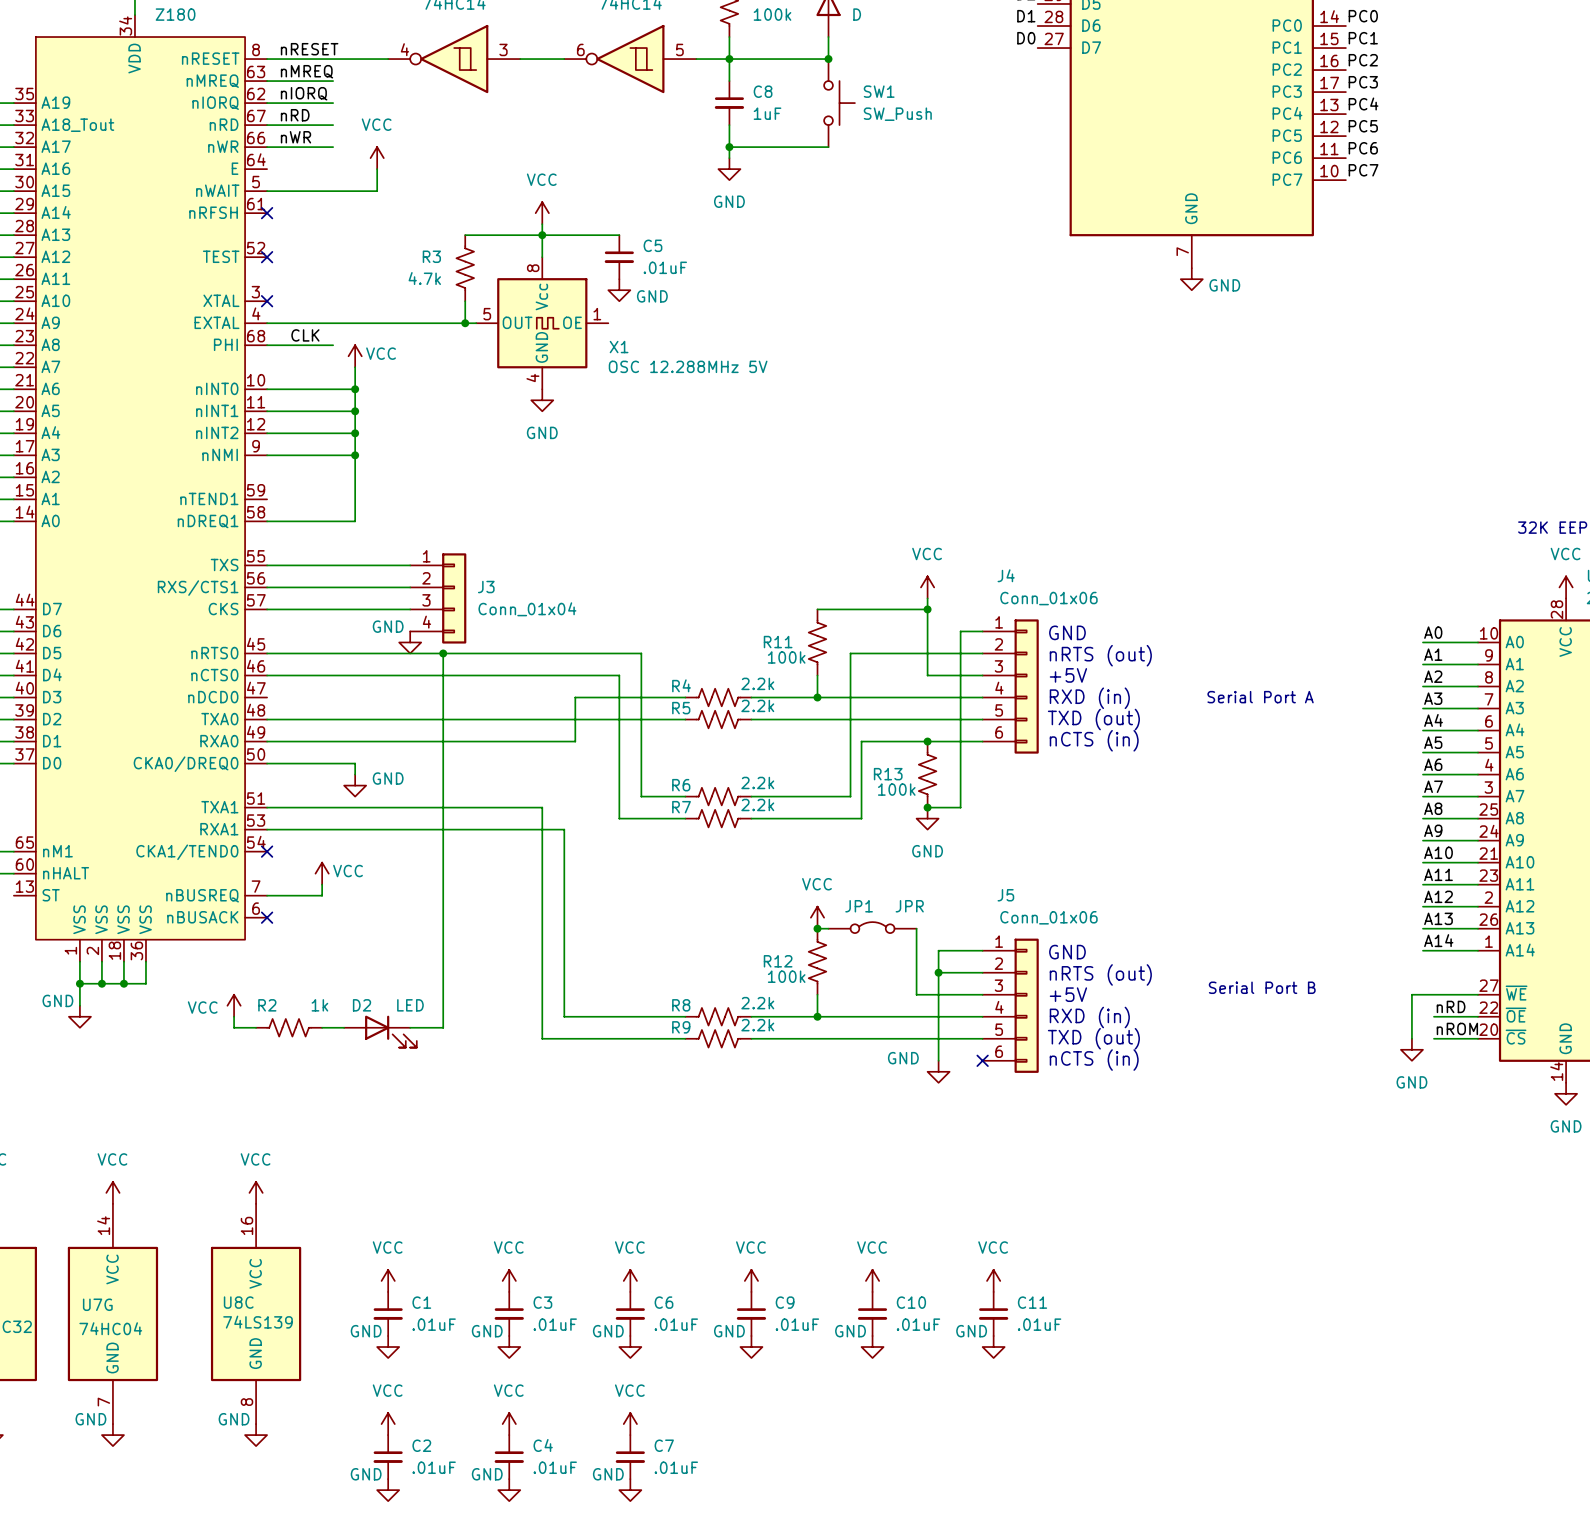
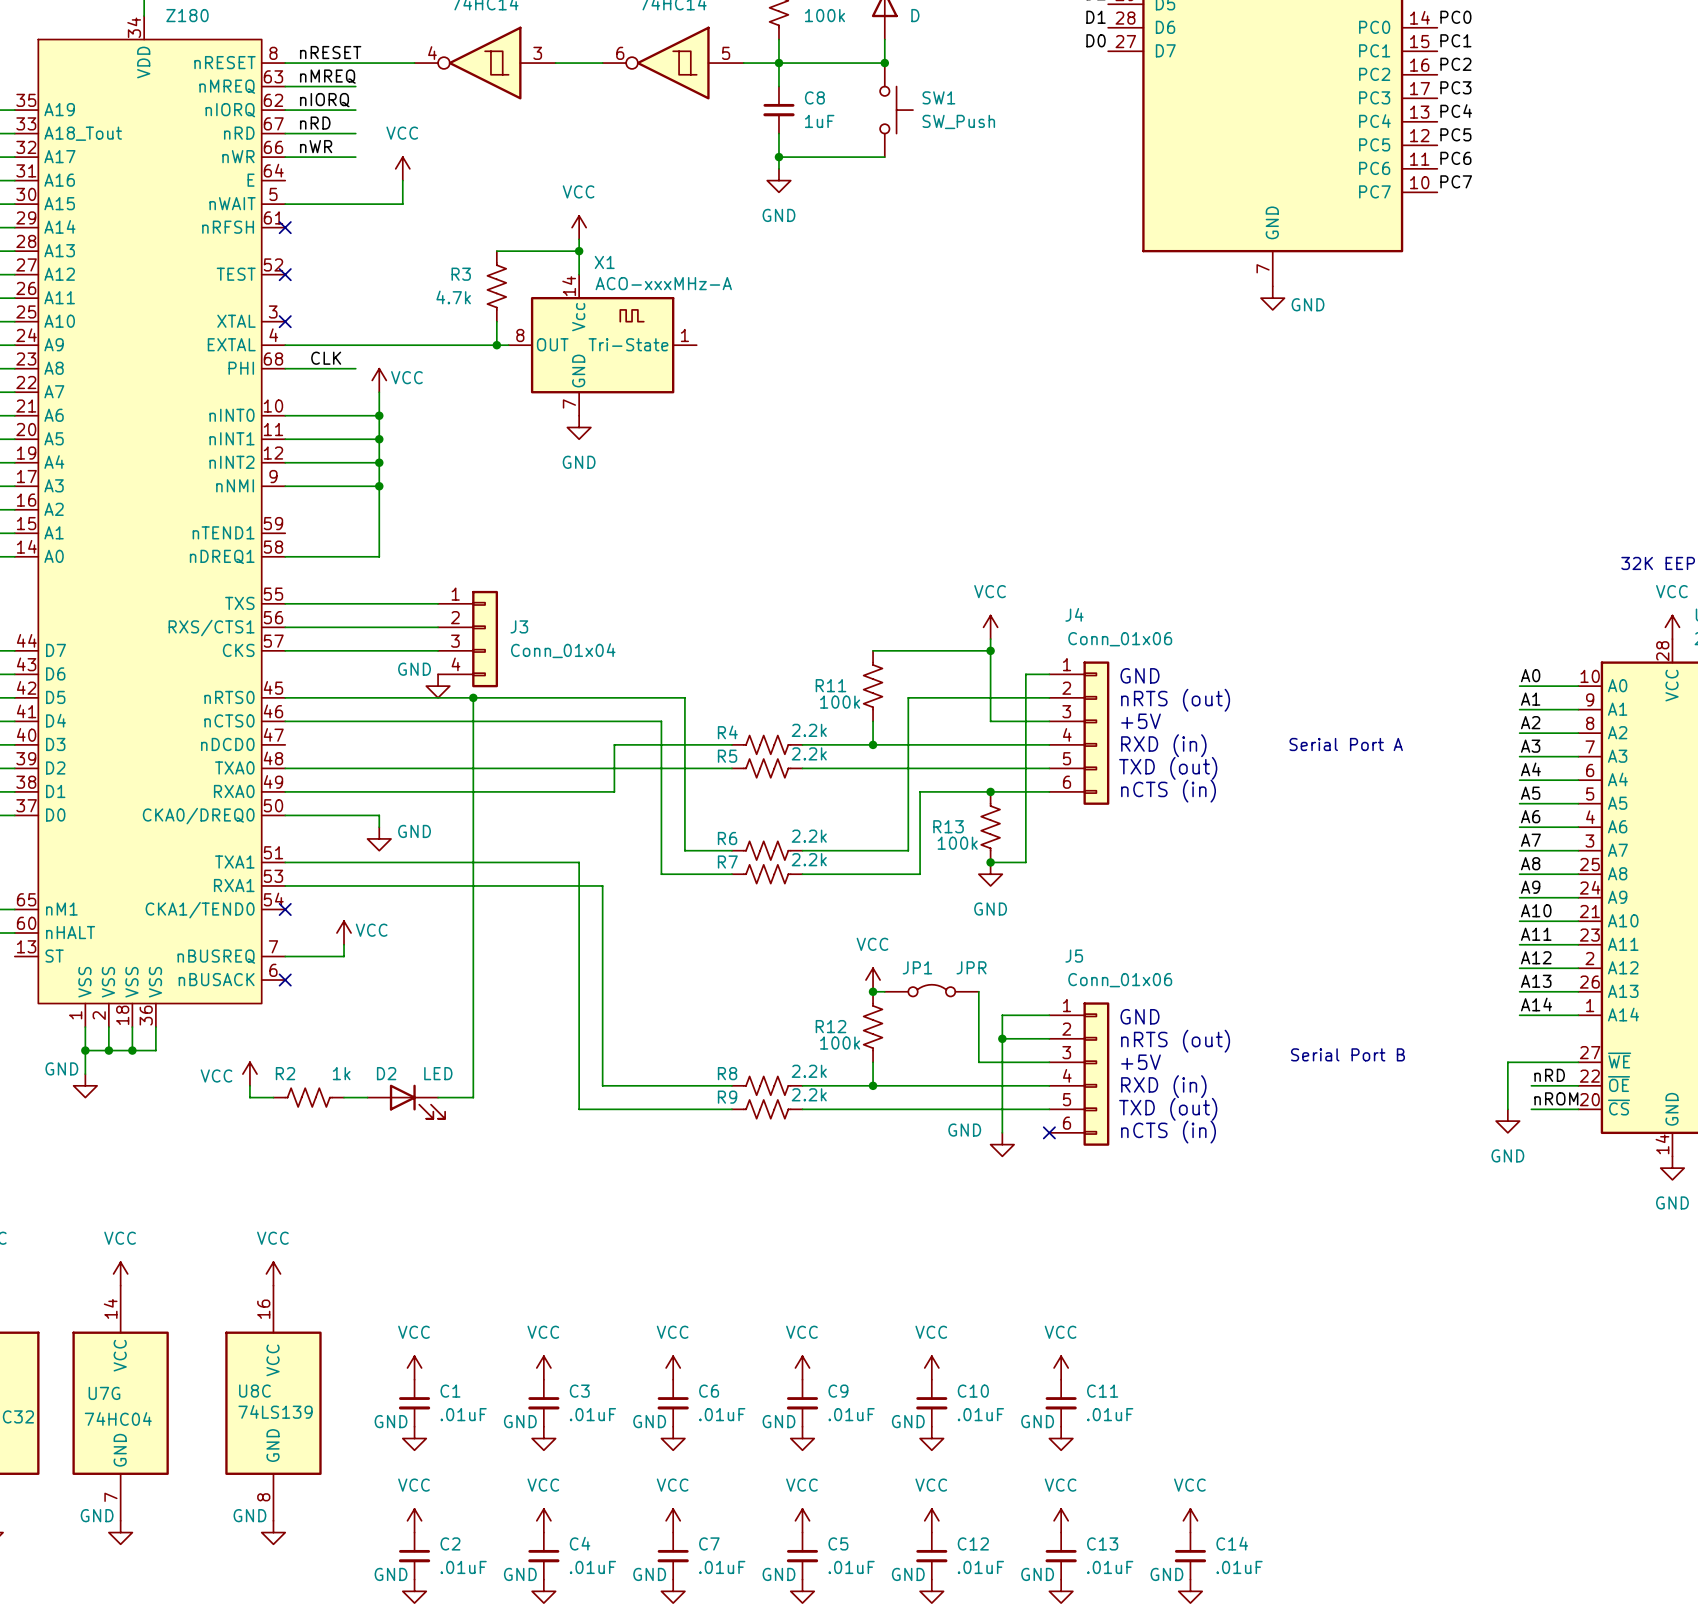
wire: (542, 235) (619, 235) -> none
X1 symbol: [476, 257, 609, 390] -> [508, 274, 697, 416]
C5 position: (619, 257) -> (802, 1556)
power symbol: GND (619, 290) -> none
X1 name position: X1 (619, 347) -> X1 (604, 262)
X1 value: OSC 12.288MHz 5V (688, 366) -> ACO-xxxMHz-A (663, 283)
power symbol: none -> VCC (802, 1520)
power symbol: none -> VCC (931, 1520)
power symbol: none -> VCC (1061, 1520)
power symbol: none -> VCC (1190, 1520)
C12: none -> .01uF (931, 1556)
C13: none -> .01uF (1061, 1556)
C14: none -> .01uF (1190, 1556)
power symbol: none -> GND (802, 1591)
power symbol: none -> GND (931, 1591)
power symbol: none -> GND (1061, 1591)
power symbol: none -> GND (1190, 1591)

